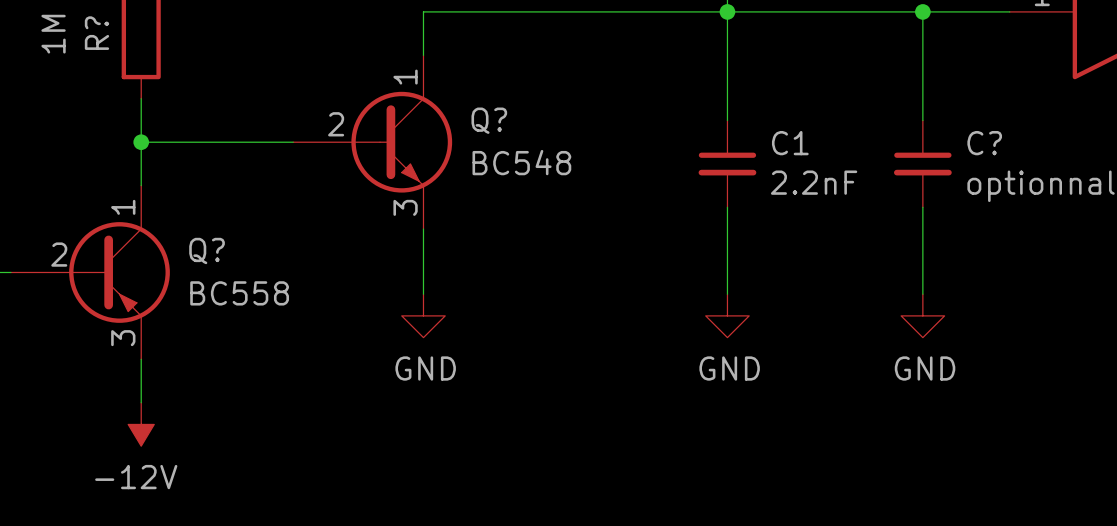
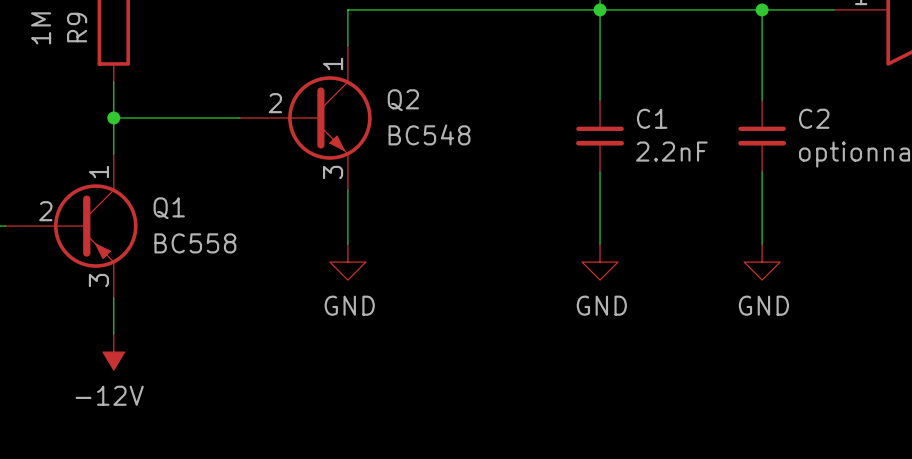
R? name: R? (96, 33) -> R9 (77, 27)
Q? name: Q? (489, 120) -> Q2 (403, 100)
C? name: C? (984, 143) -> C2 (814, 118)
Q? name: Q? (207, 250) -> Q1 (169, 208)

